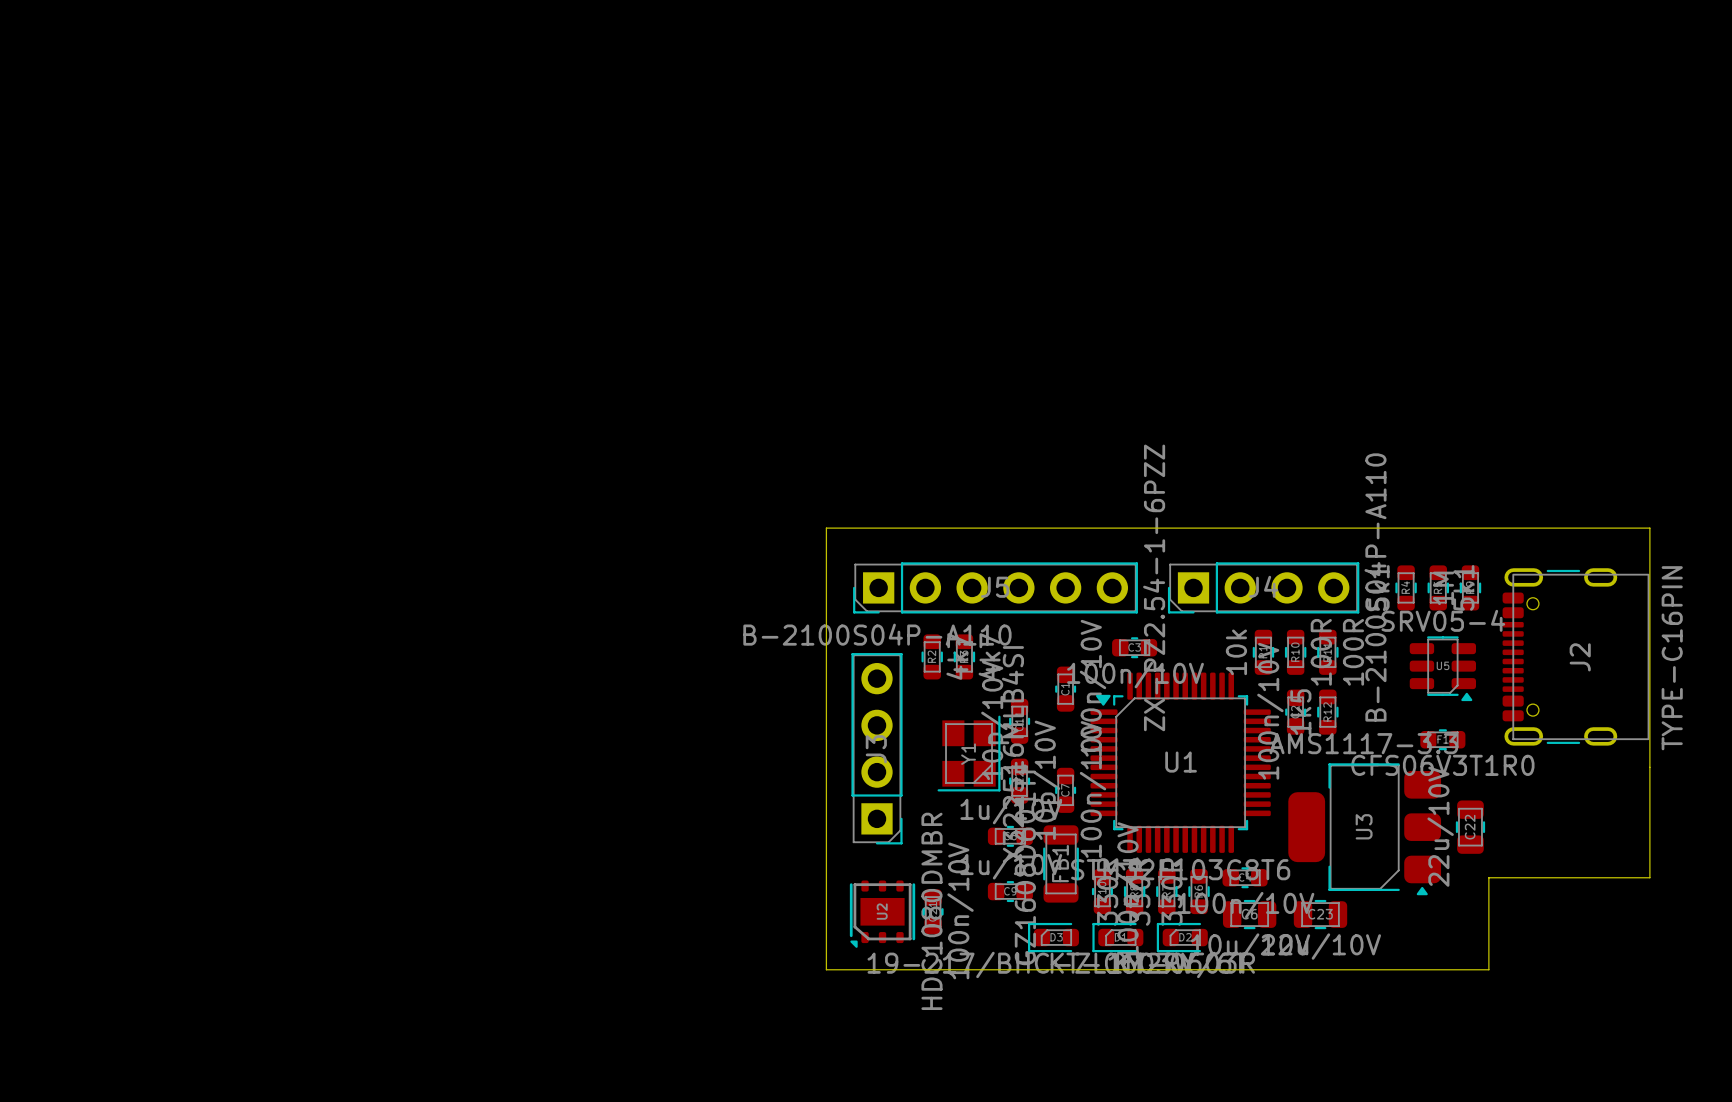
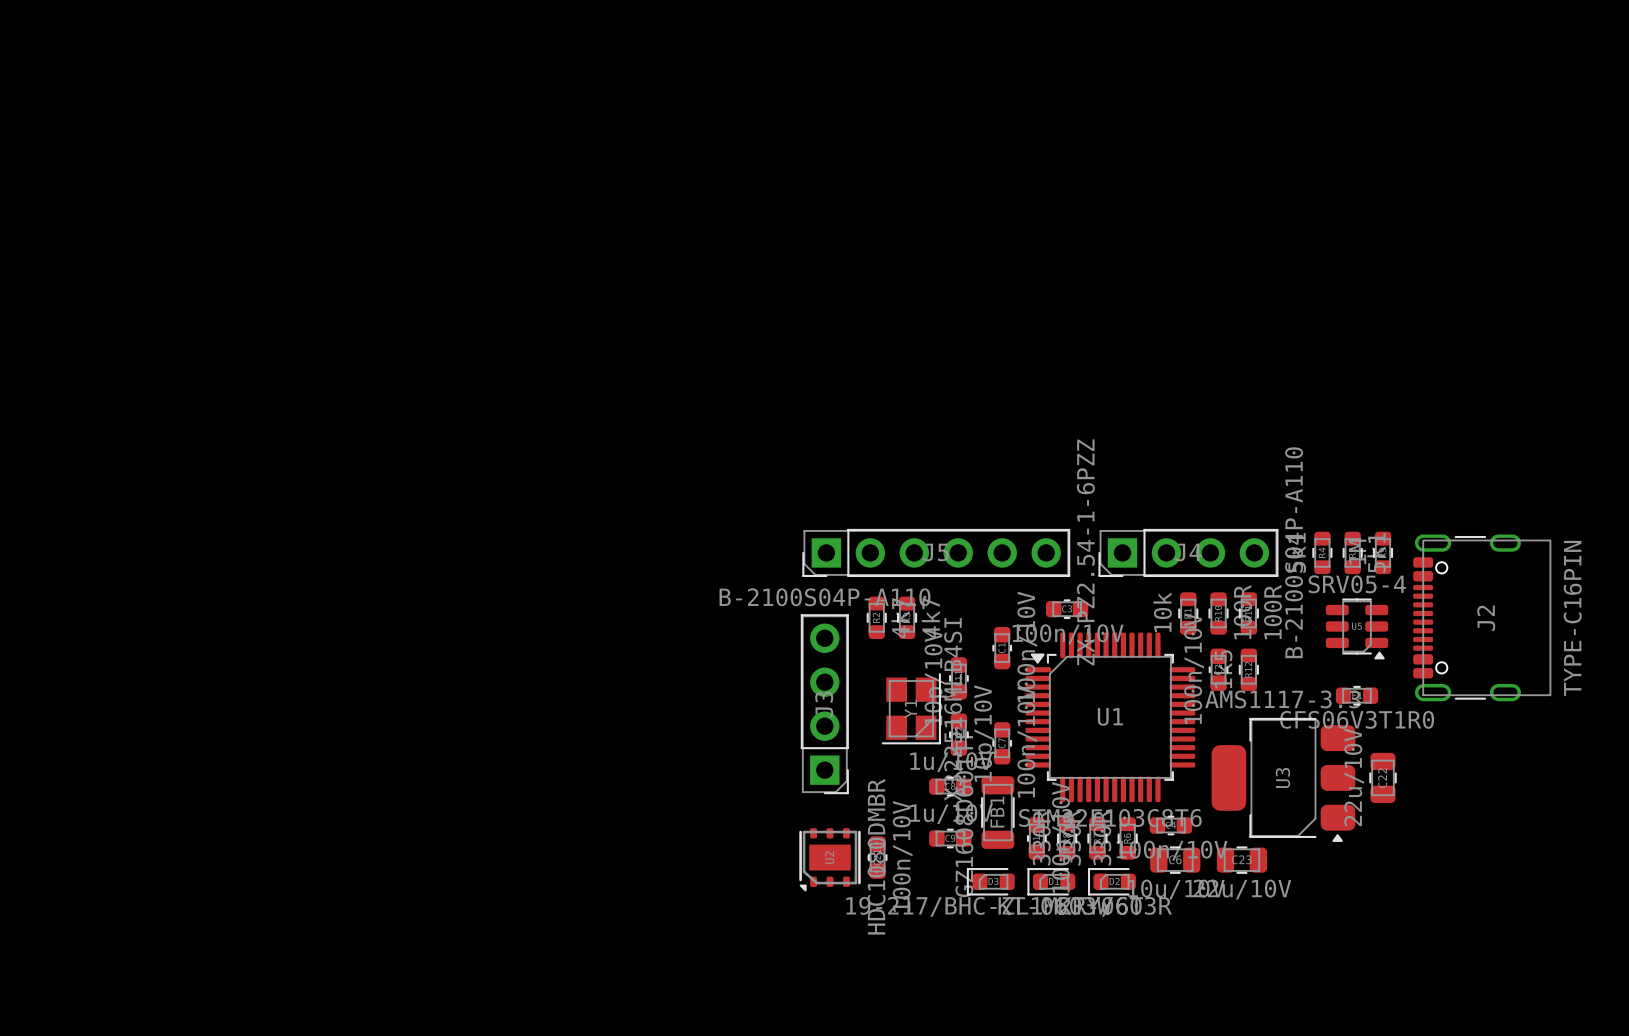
board edge: (826, 528) (826, 969) (1488, 969) (1488, 877) (1649, 877) (1649, 528) (826, 528) -> none

